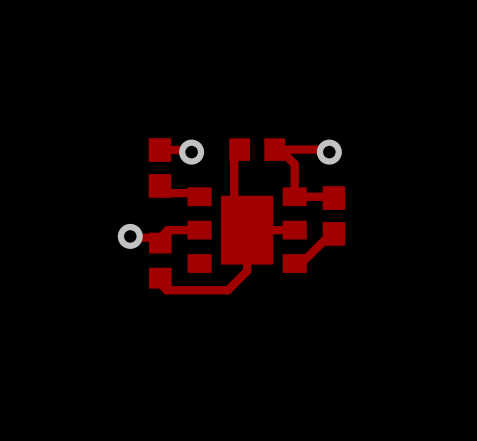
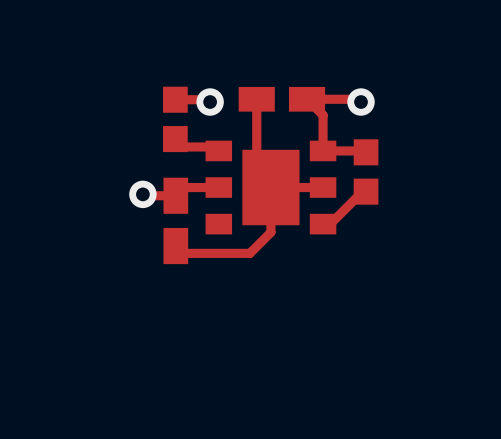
part footprint: [229, 138, 286, 161] -> [238, 86, 326, 112]
part footprint: [149, 232, 172, 289] -> [163, 177, 189, 265]

